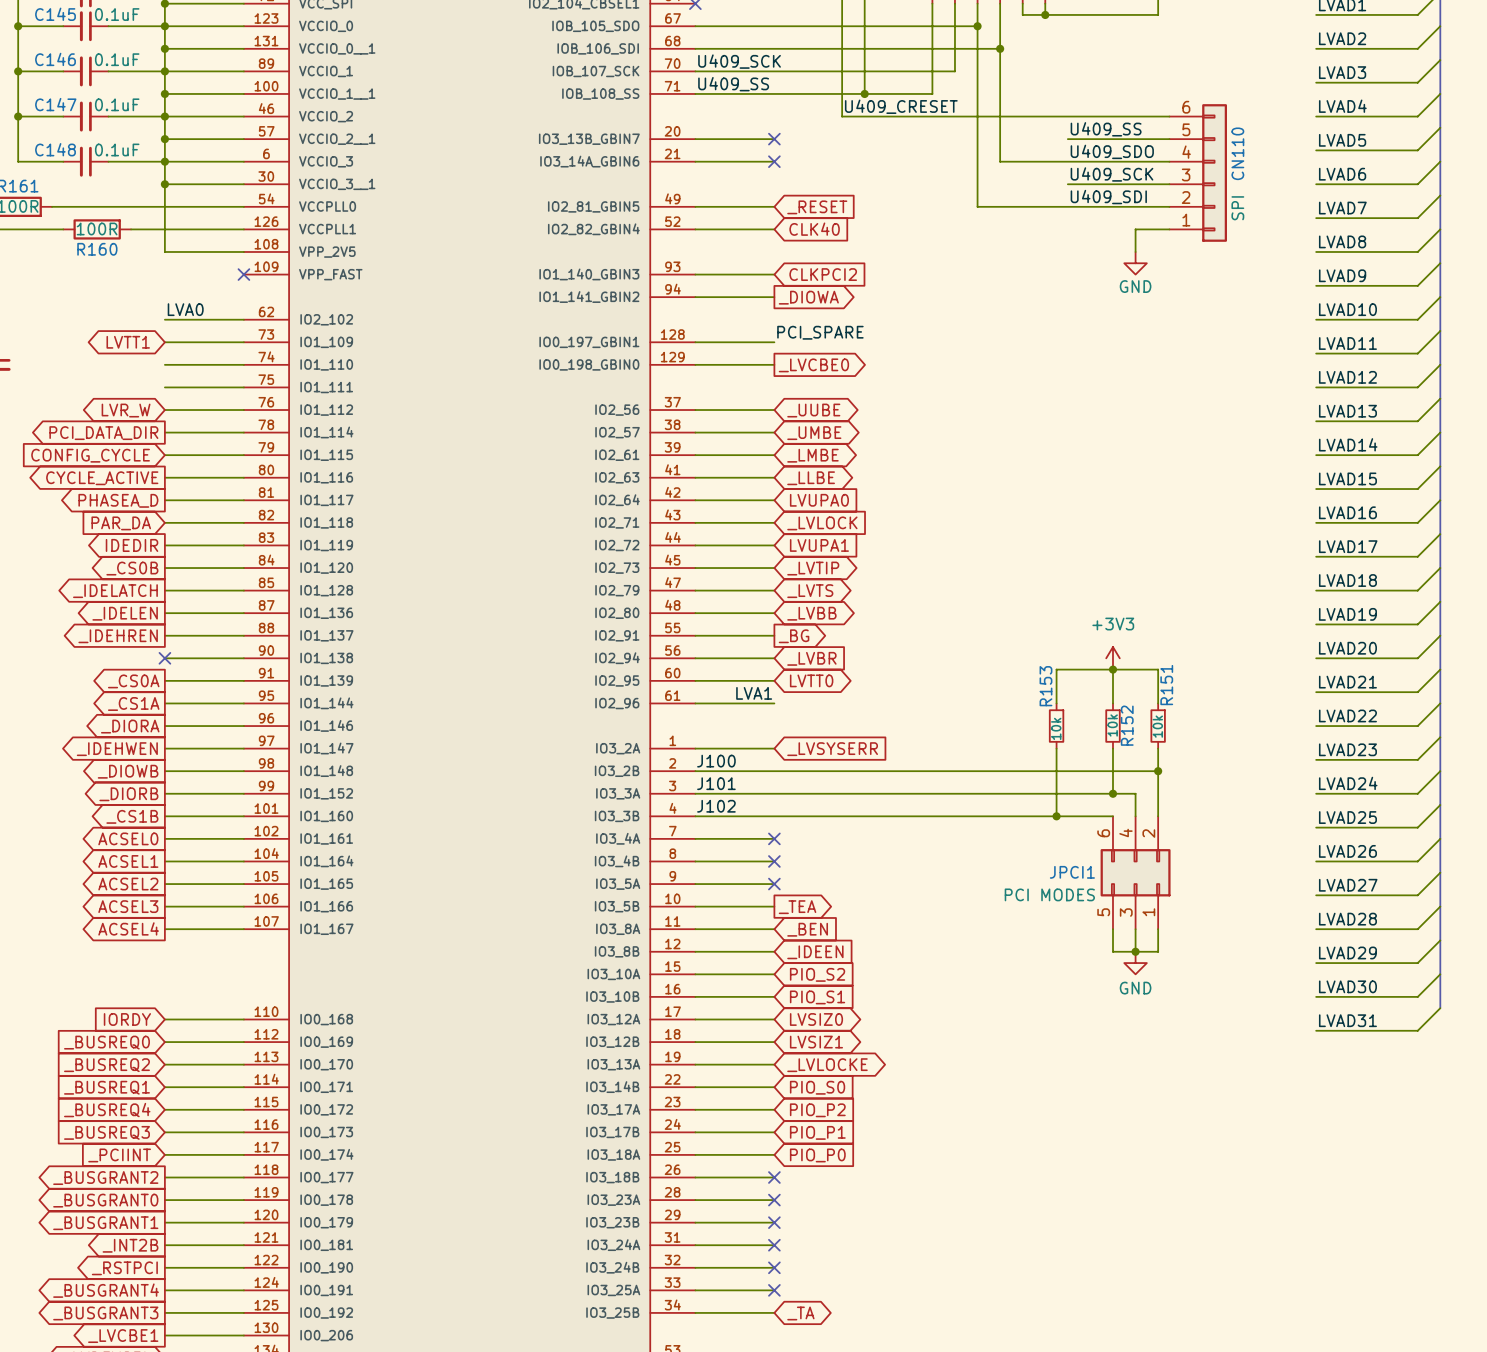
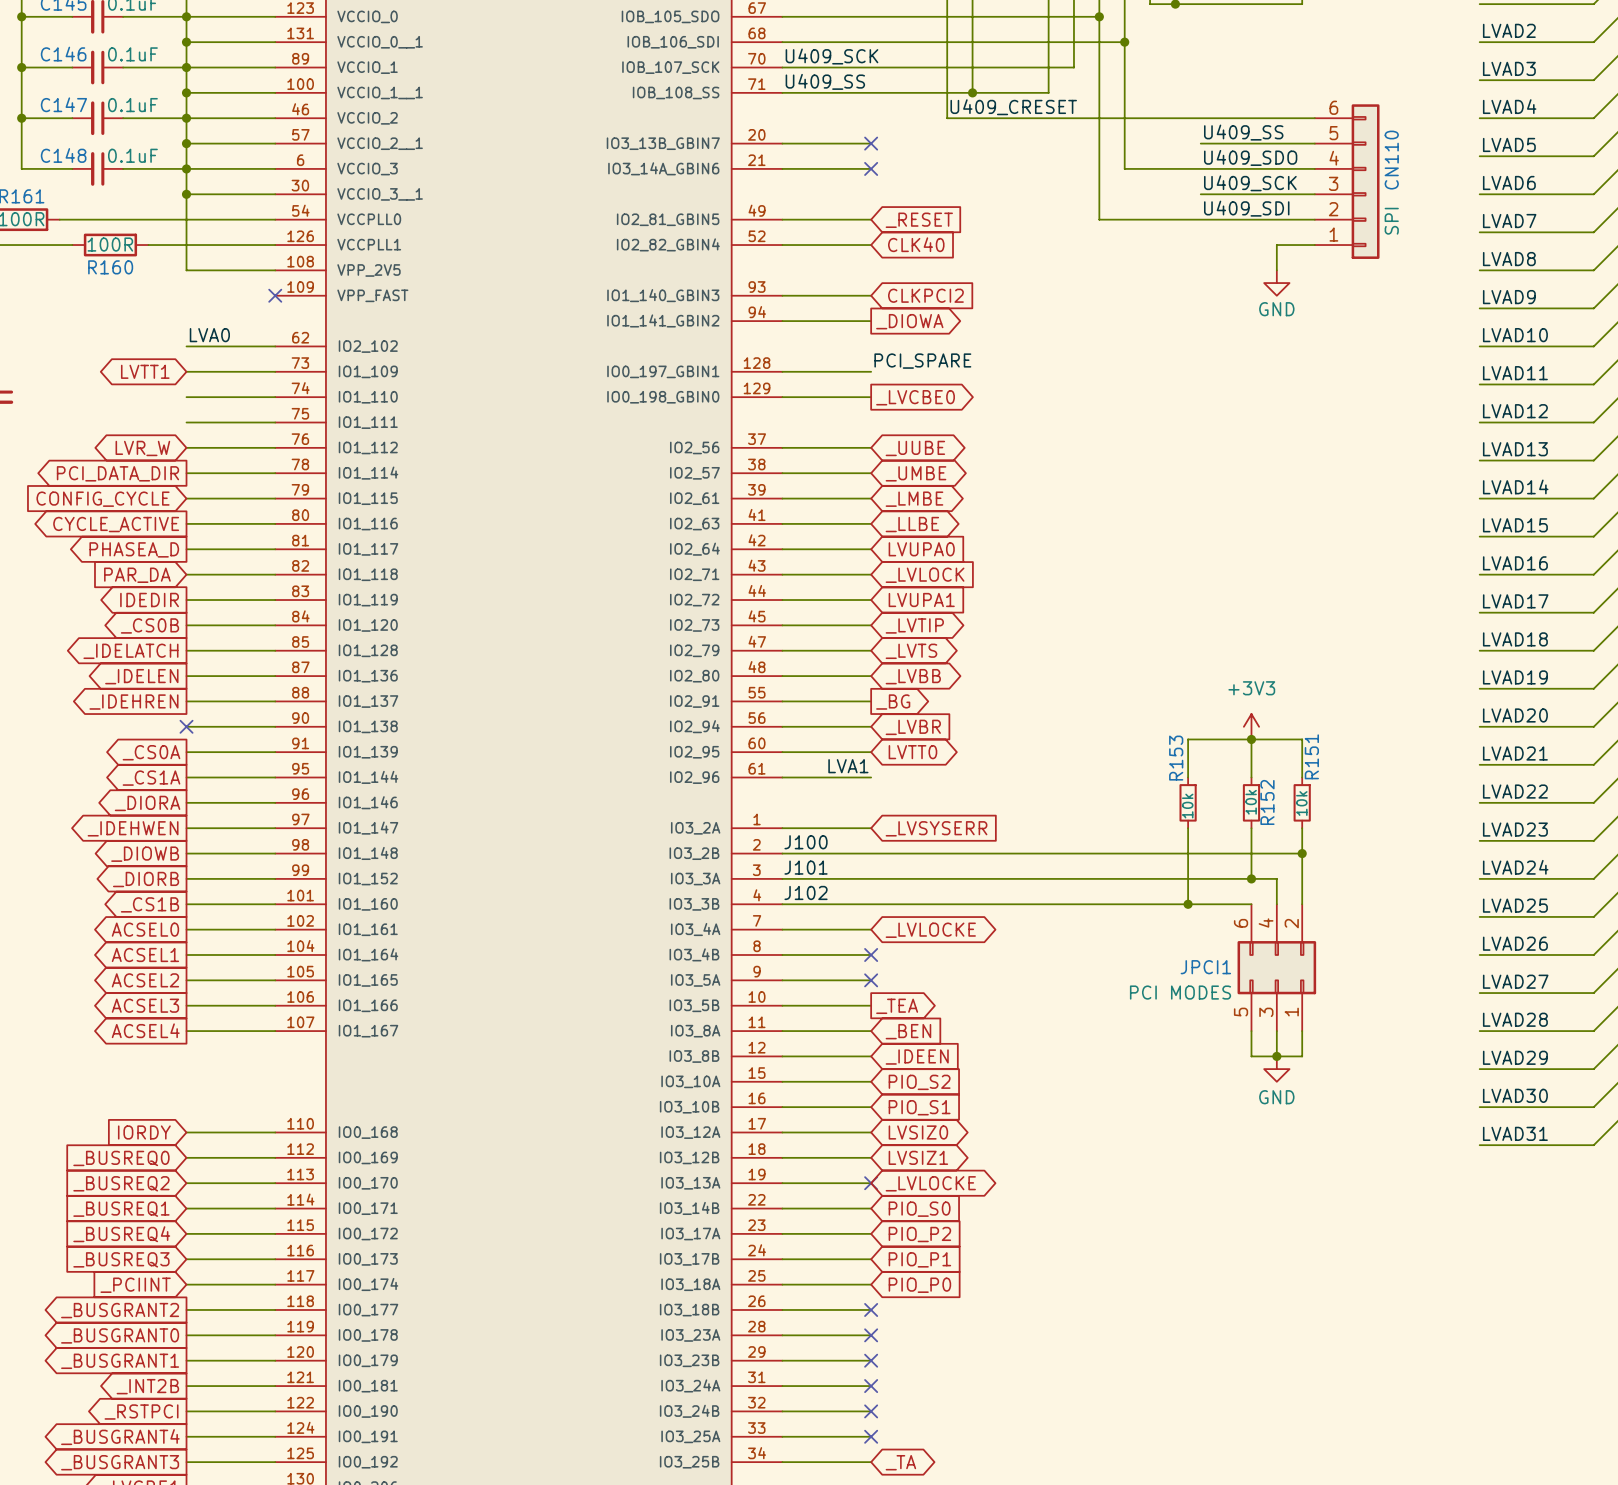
no-connect mark: (774, 838) -> none
global label: none -> _LVLOCKE (930, 930)
no-connect mark: none -> (871, 1183)

